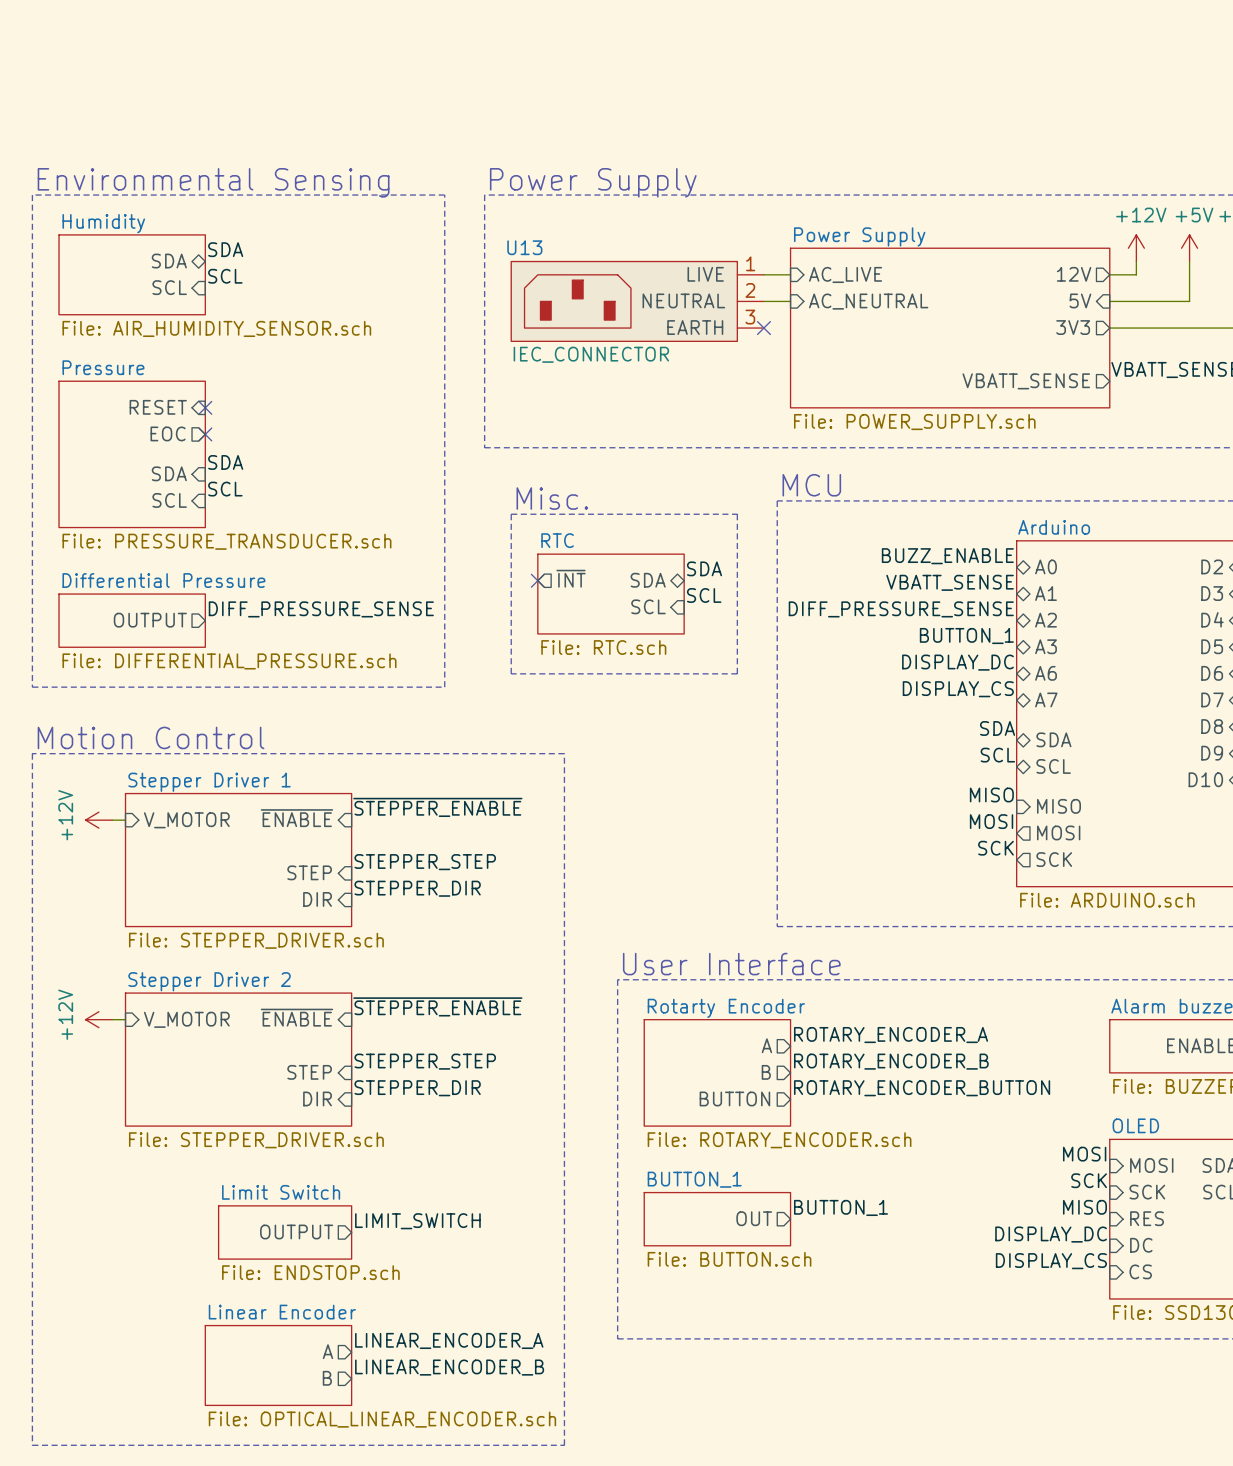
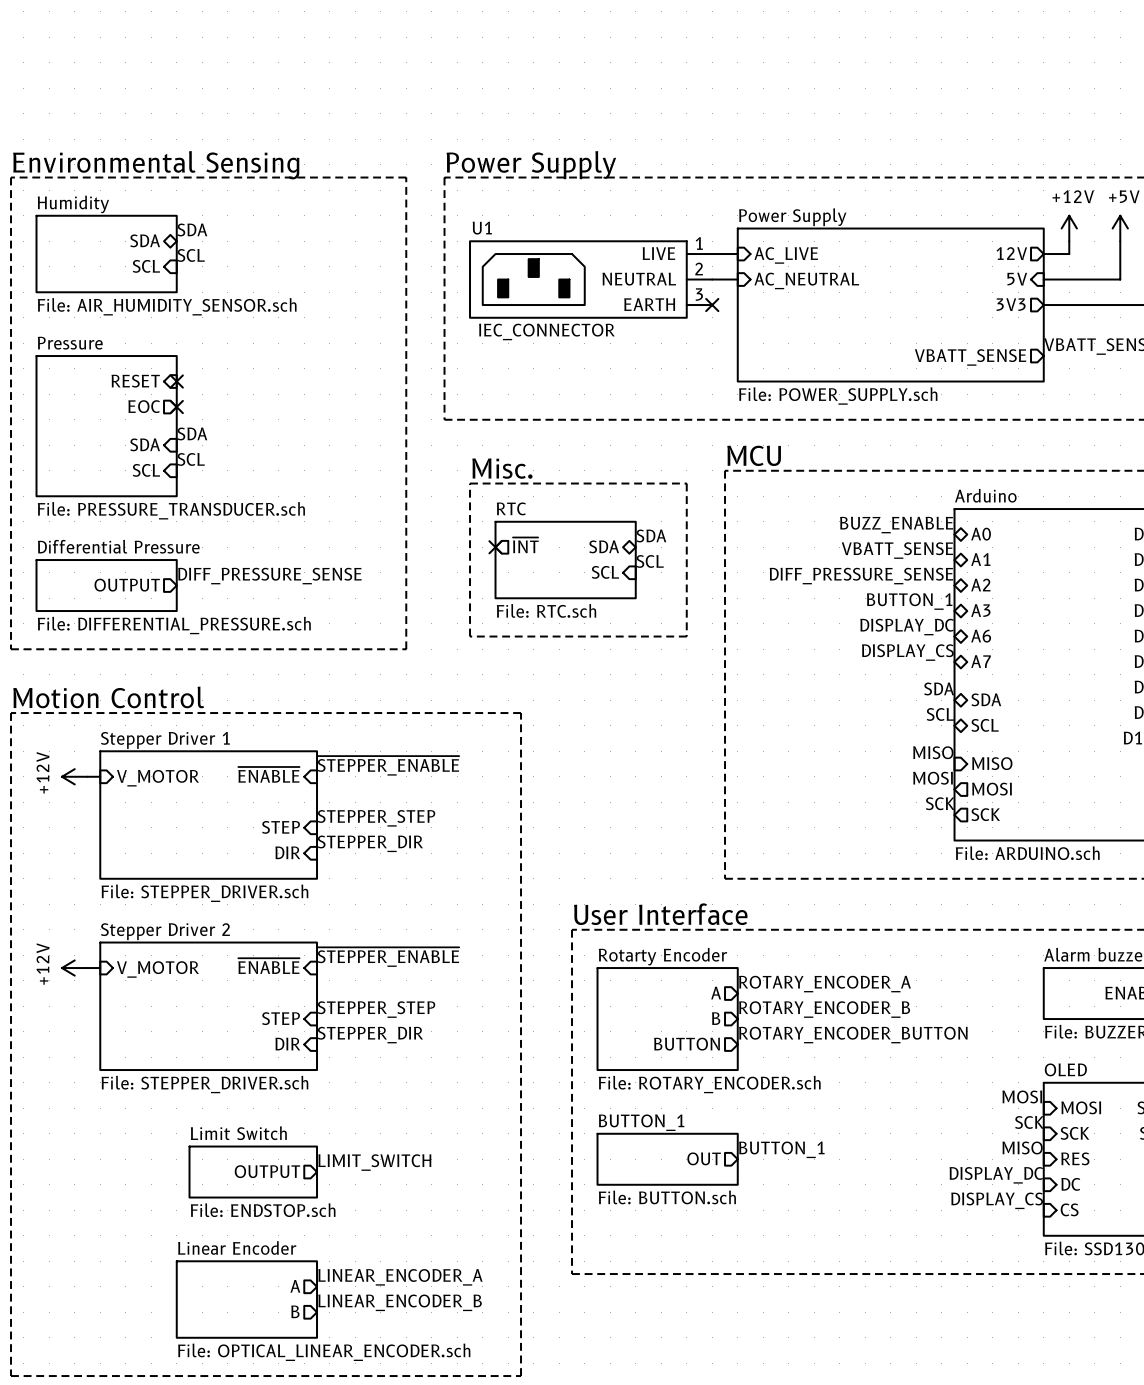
U13 name: U13 (524, 247) -> U1 (482, 228)

